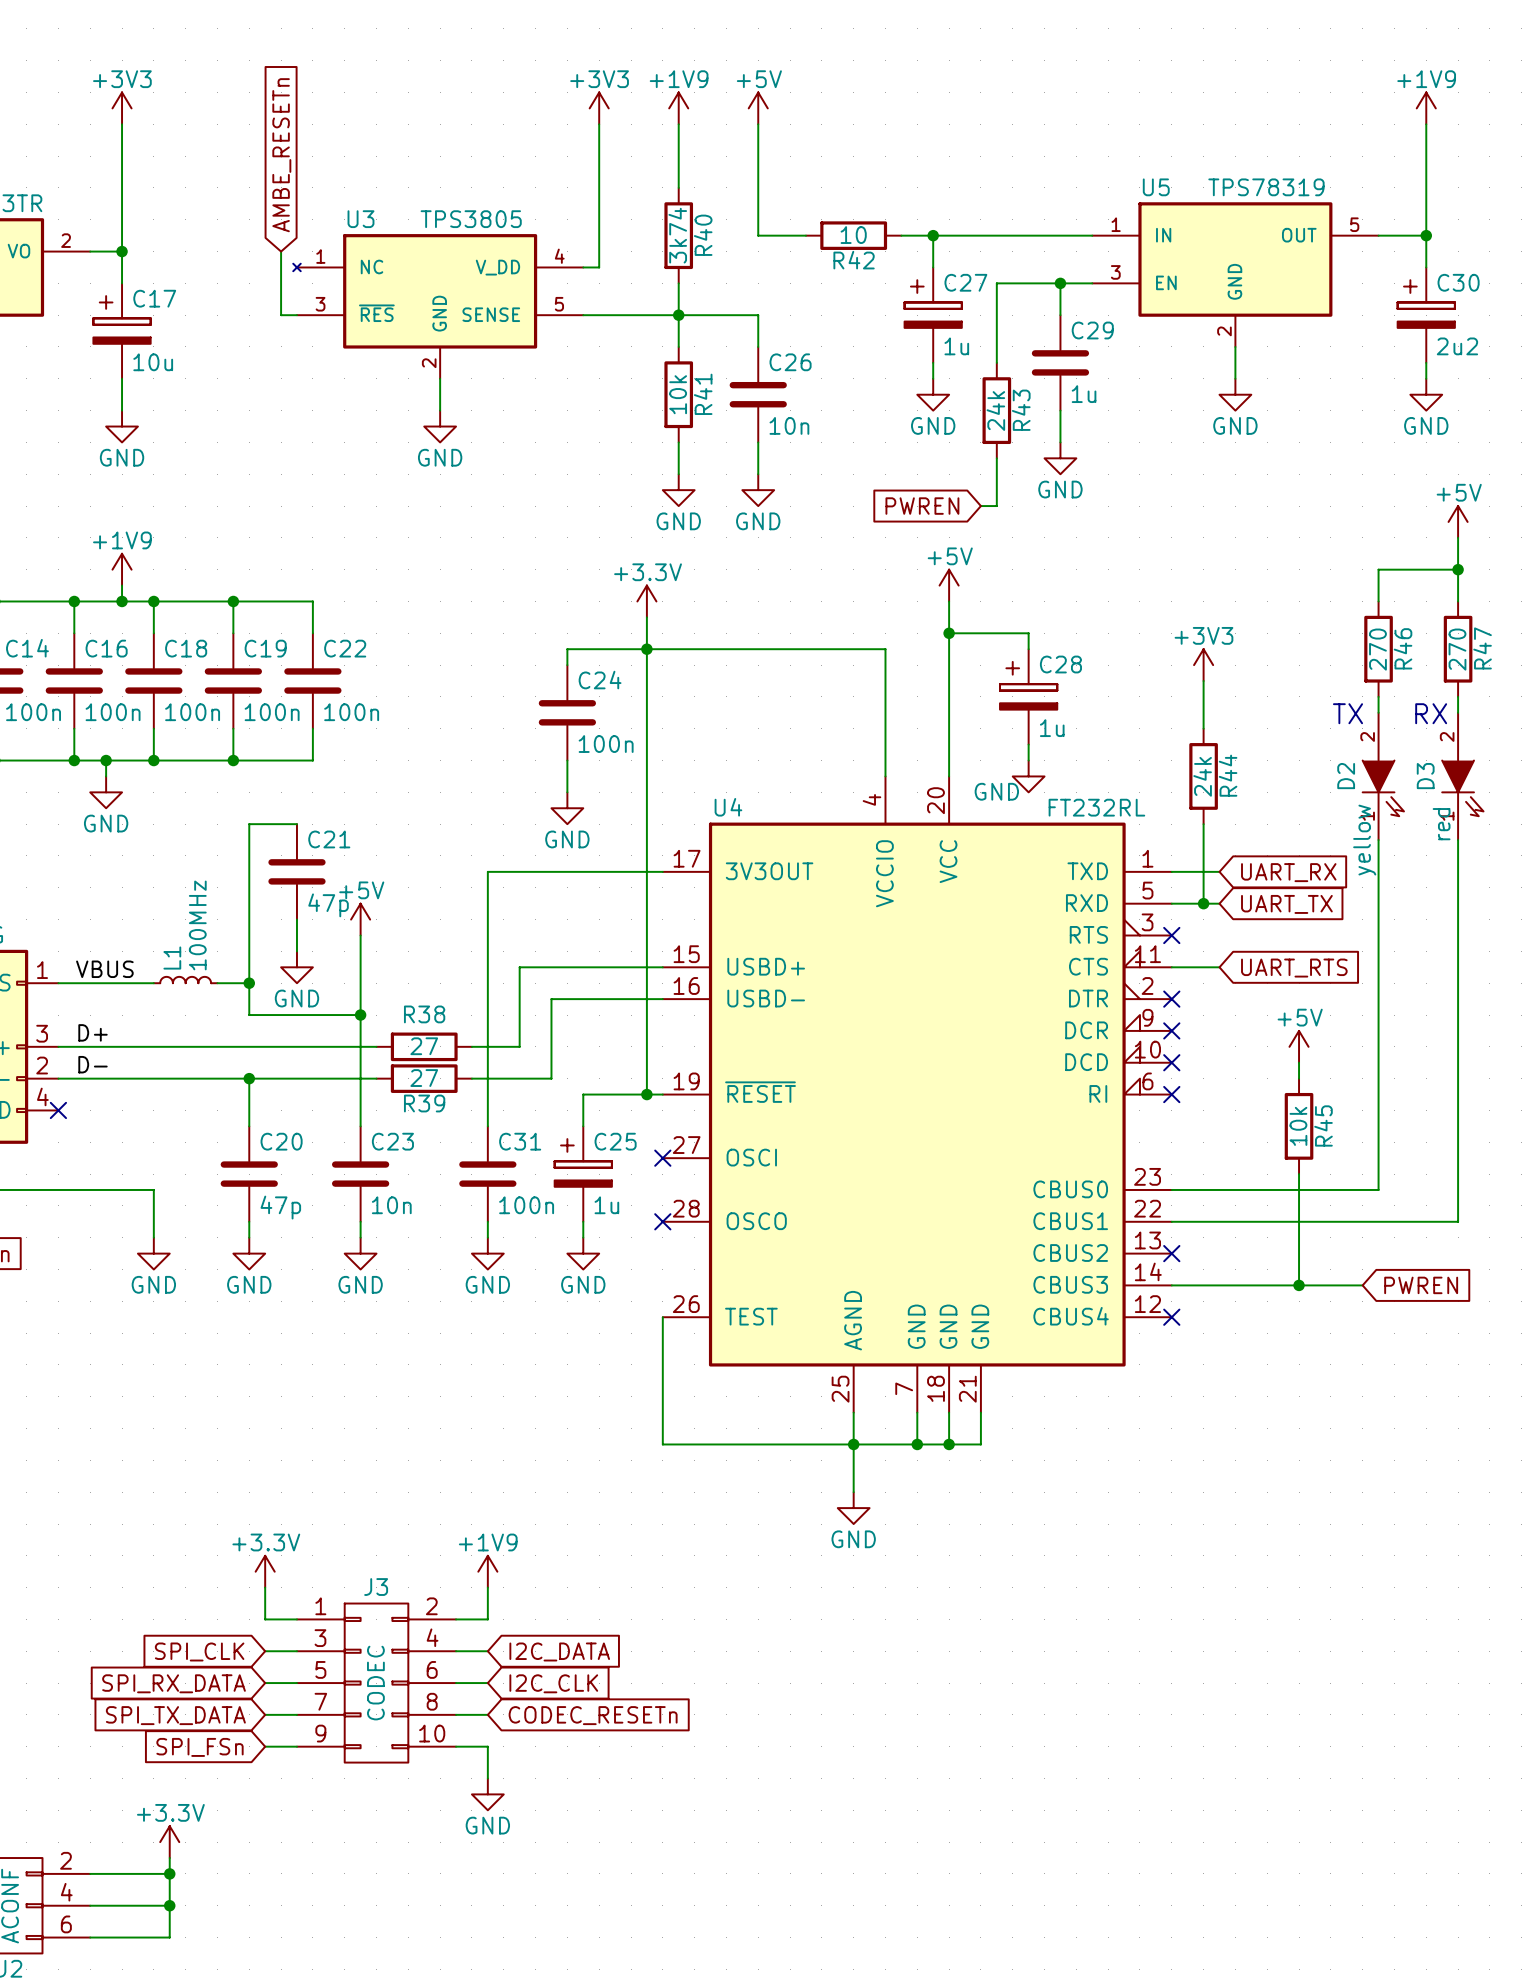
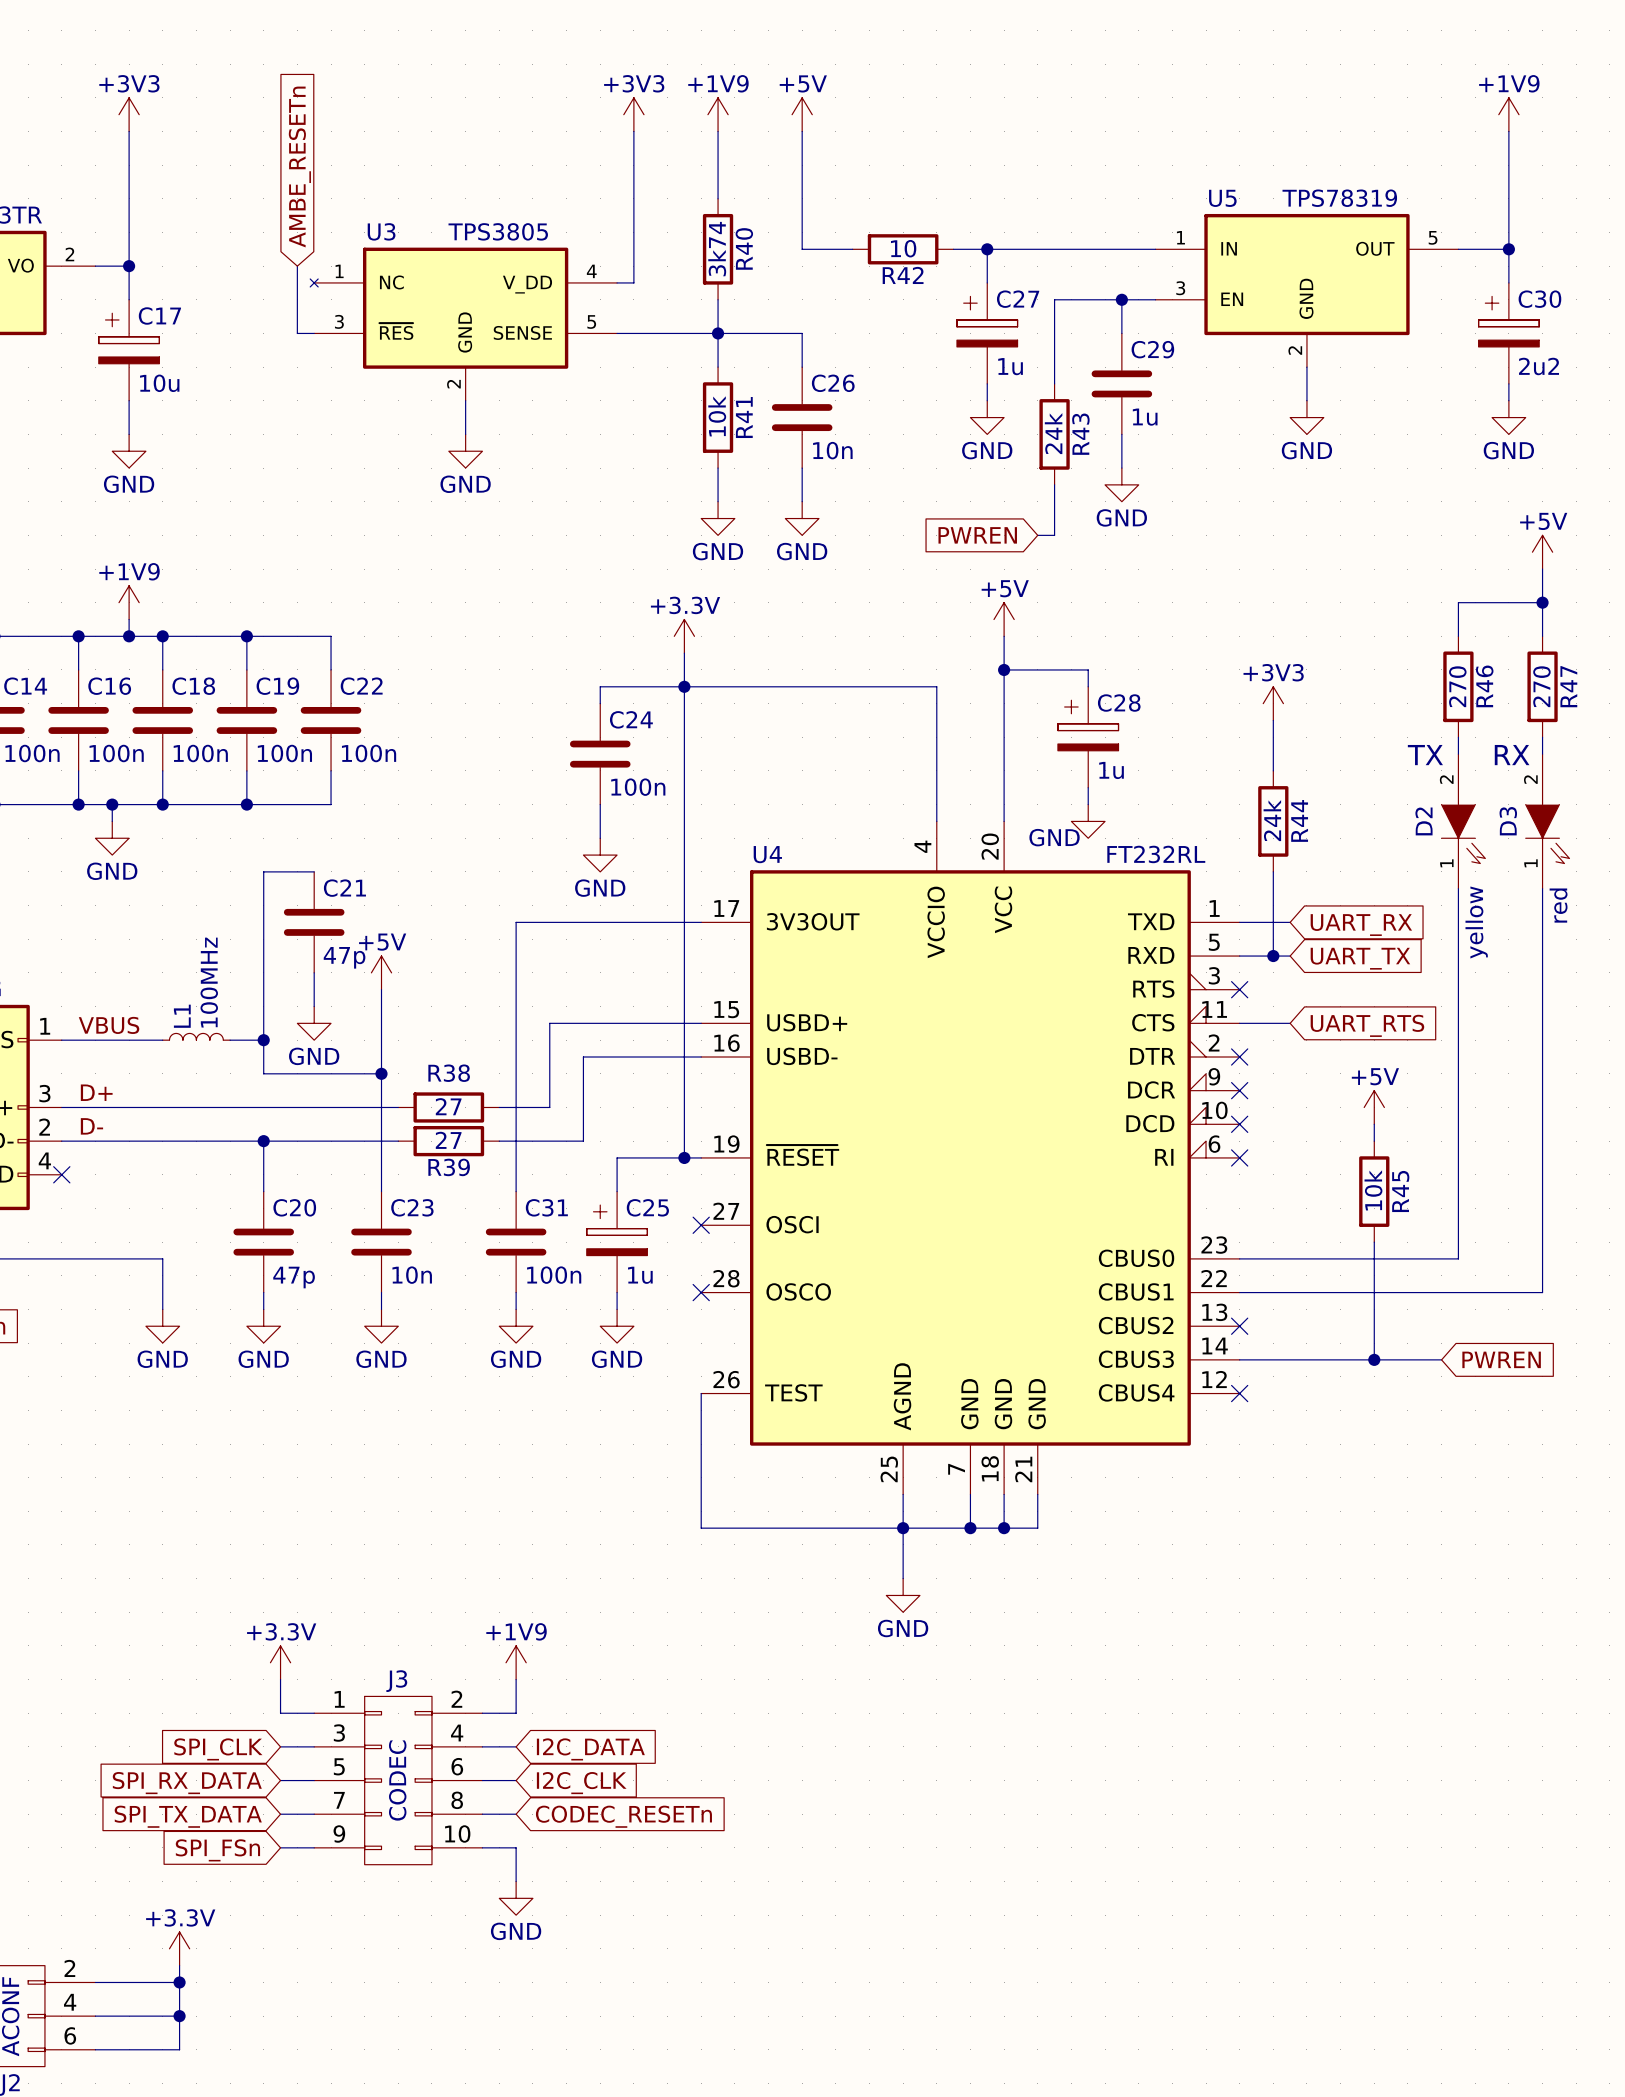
D3 value position: red (1441, 824) -> red (1558, 905)
D2 value position: yellow (1364, 840) -> yellow (1476, 922)

